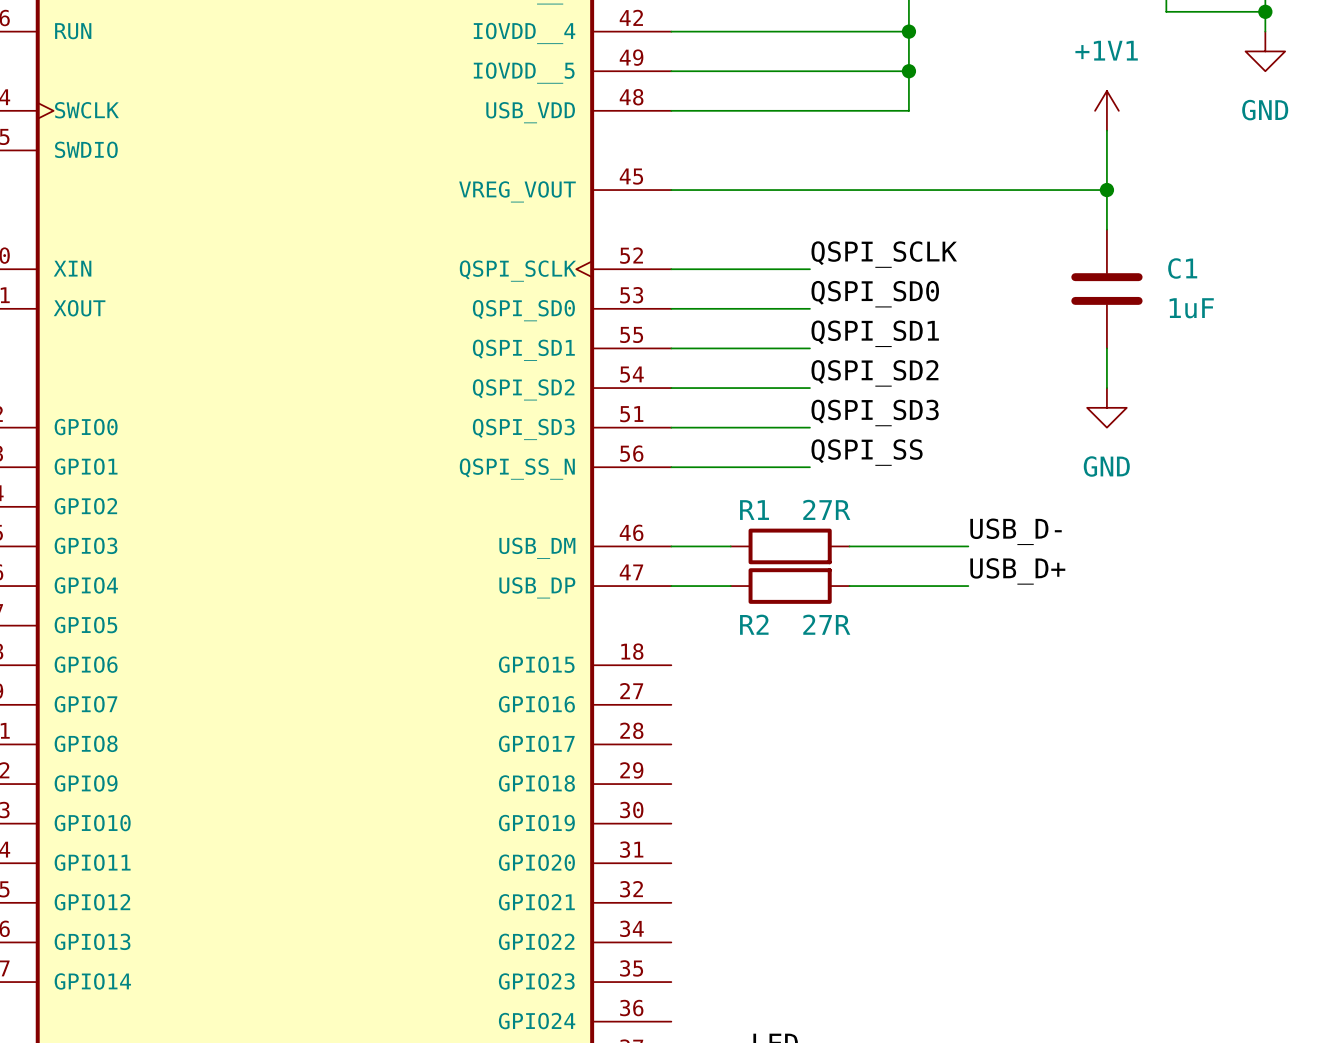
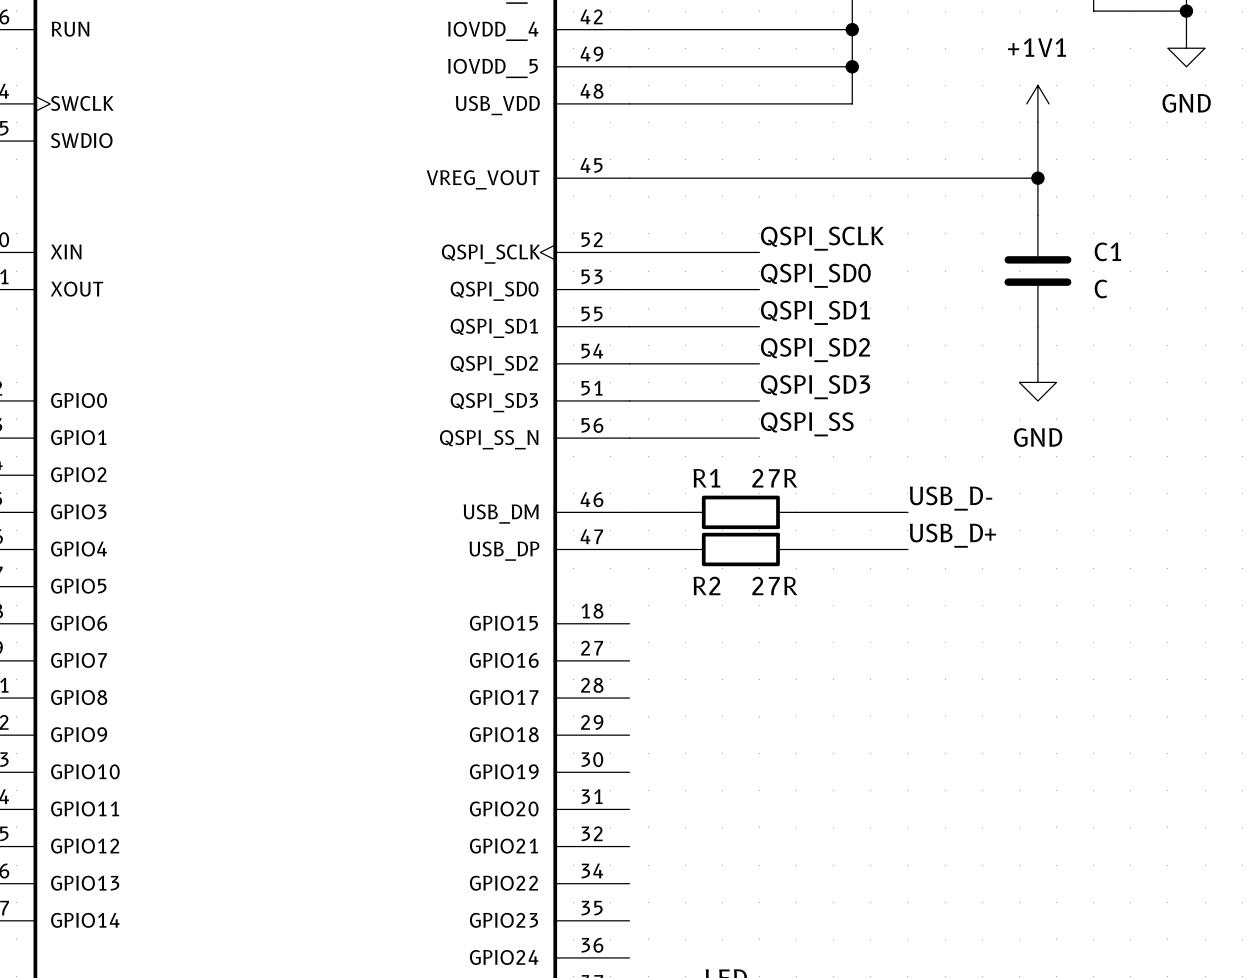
C1 value: 1uF (1191, 308) -> C (1101, 289)

